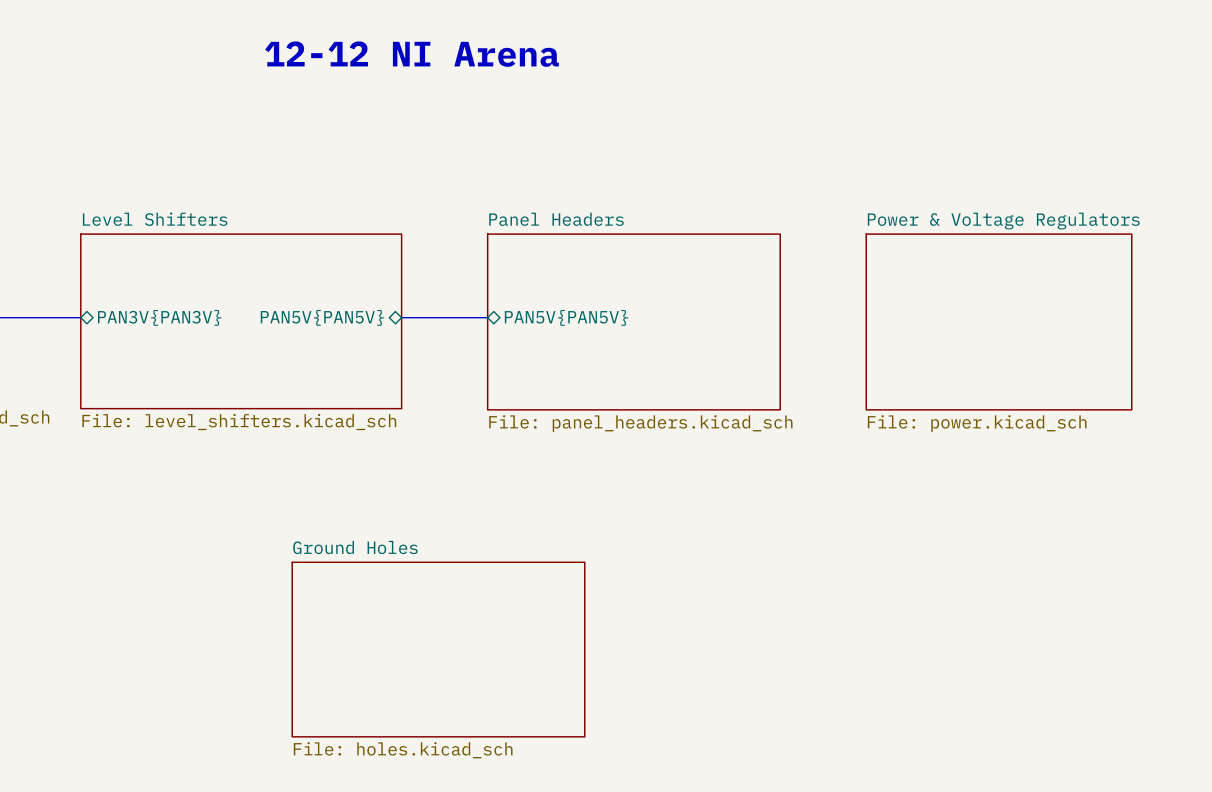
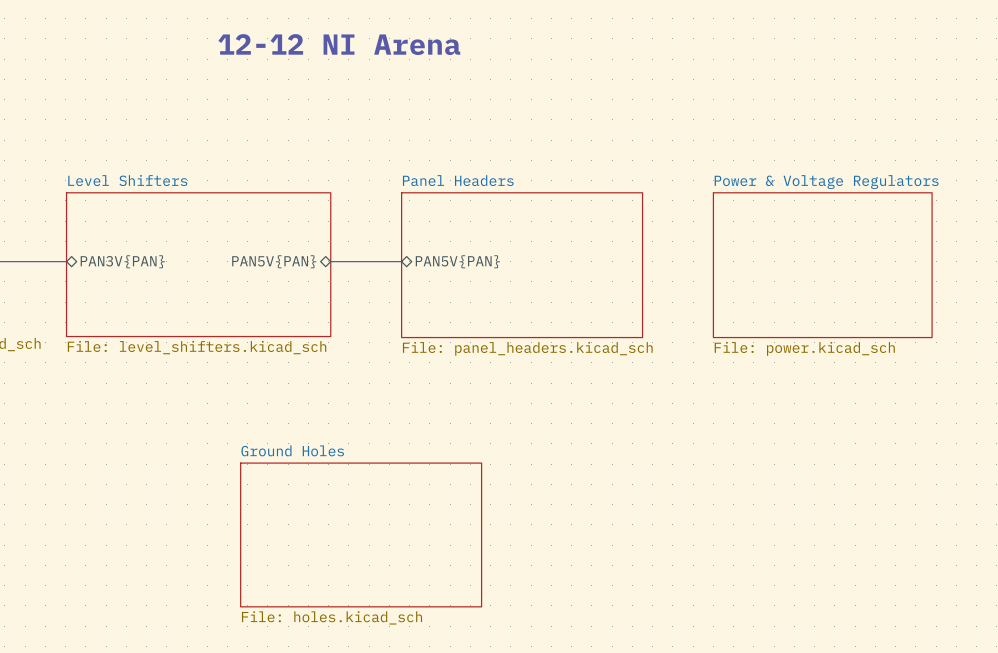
sheet pin: PAN3V{PAN3V} (159, 317) -> PAN3V{PAN} (122, 261)
sheet pin: PAN5V{PAN5V} (322, 317) -> PAN5V{PAN} (274, 261)
sheet pin: PAN5V{PAN5V} (566, 317) -> PAN5V{PAN} (457, 261)

